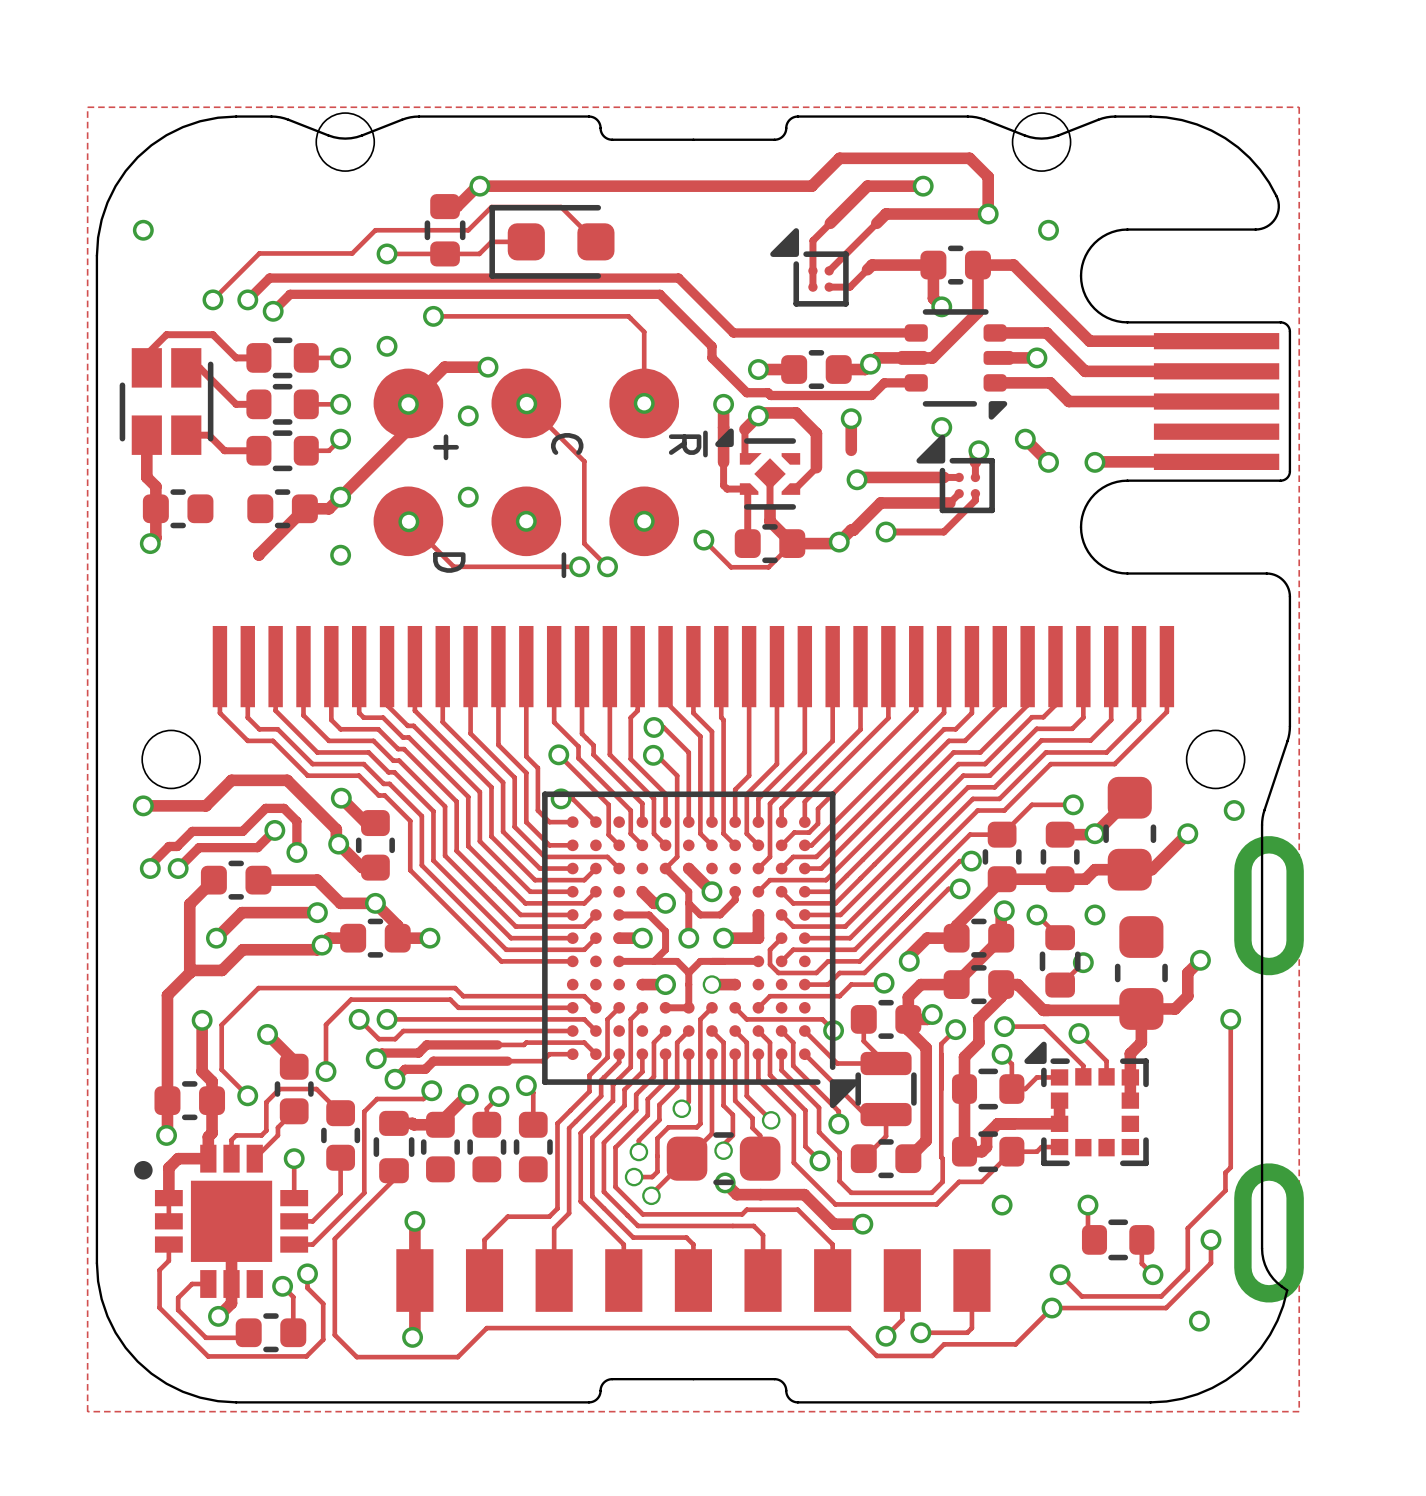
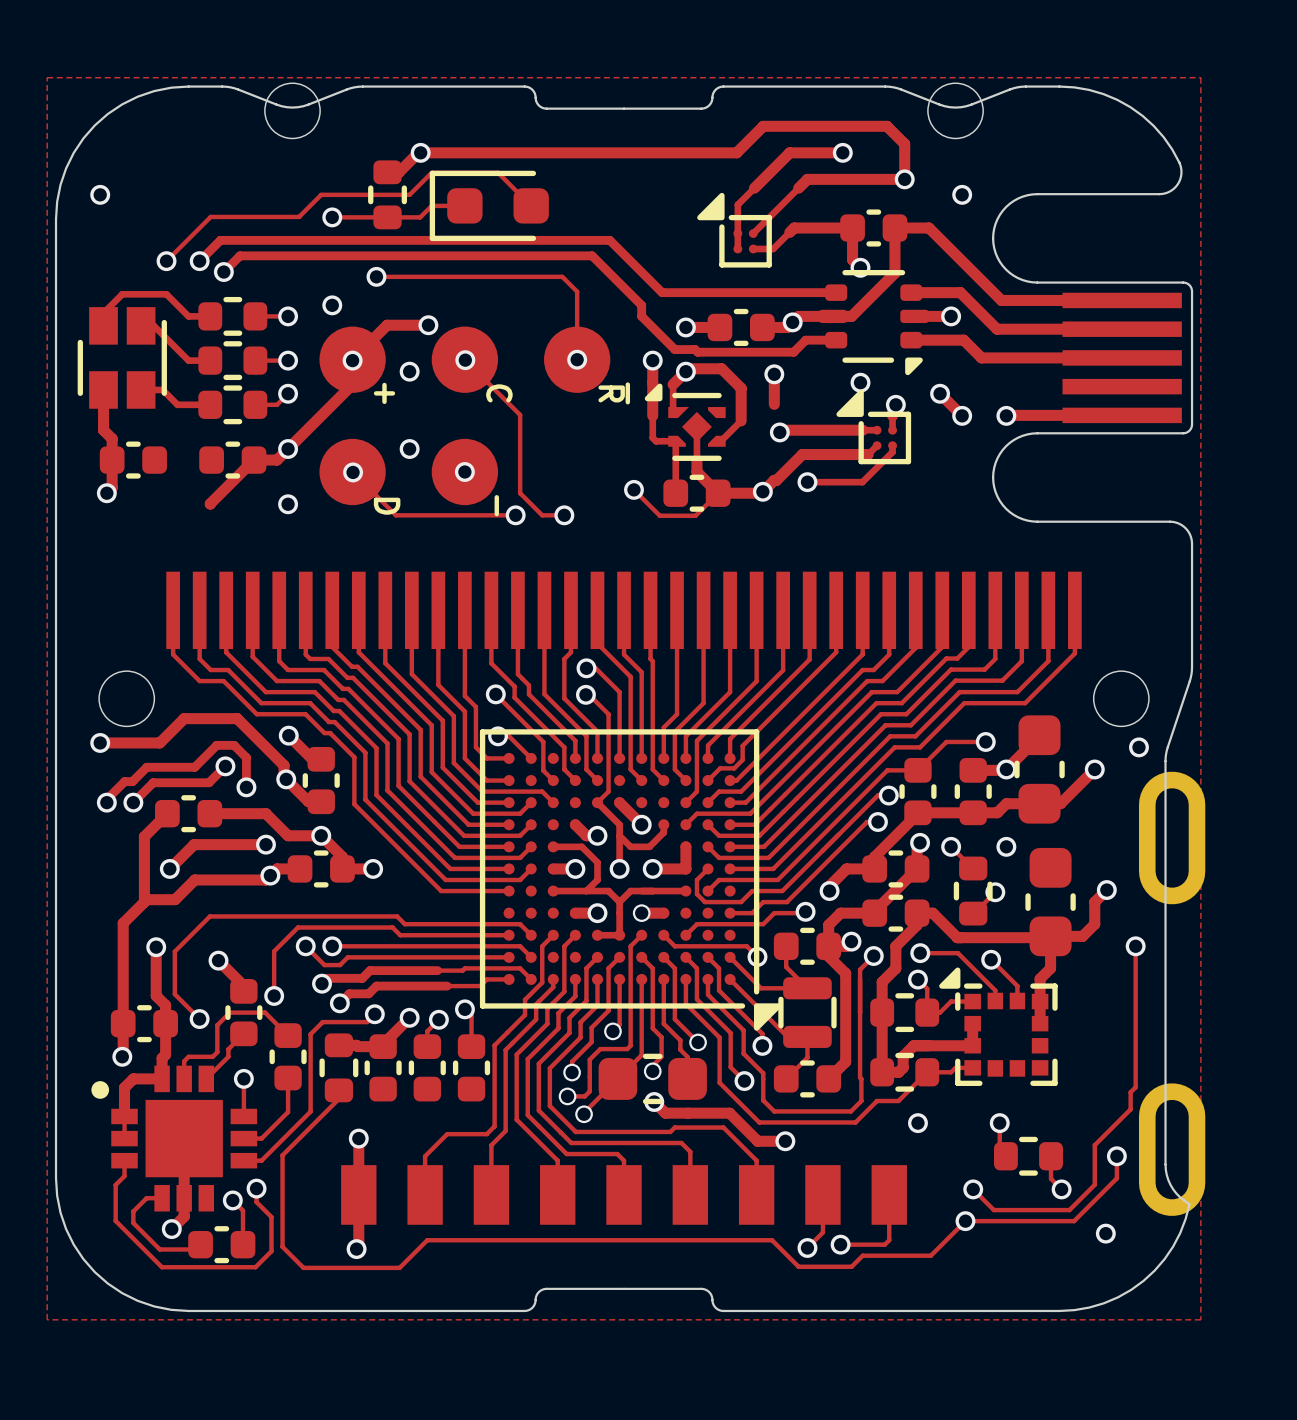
part footprint: [373, 368, 680, 557] -> [319, 326, 611, 506]
via: (644, 521) -> none
track: none -> (542, 515) (564, 515)
via position: (607, 566) -> (564, 515)

